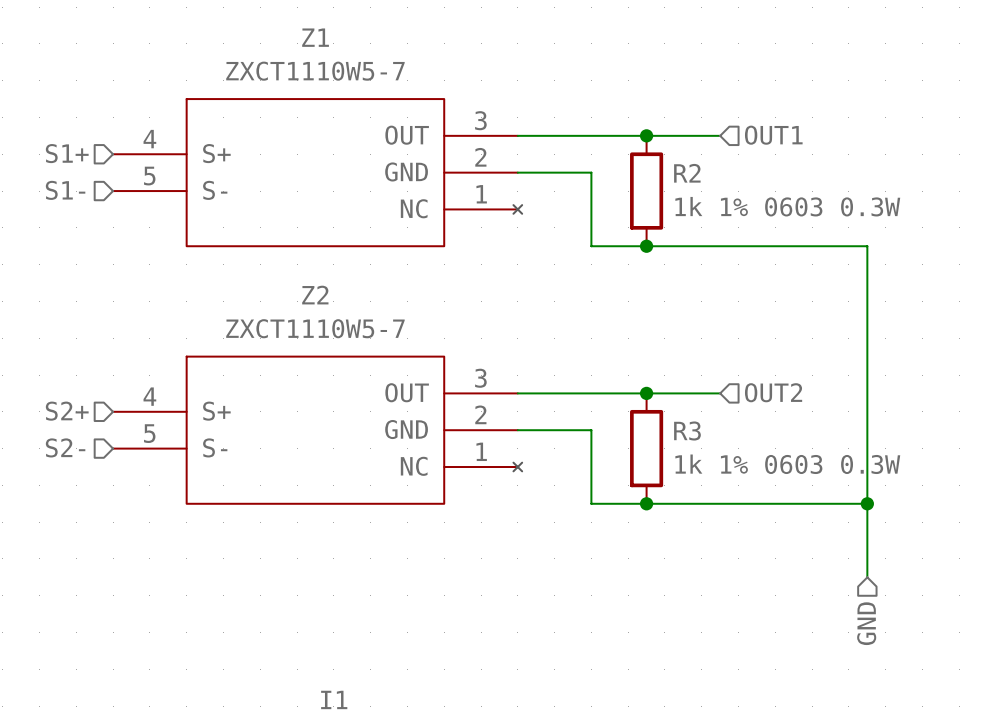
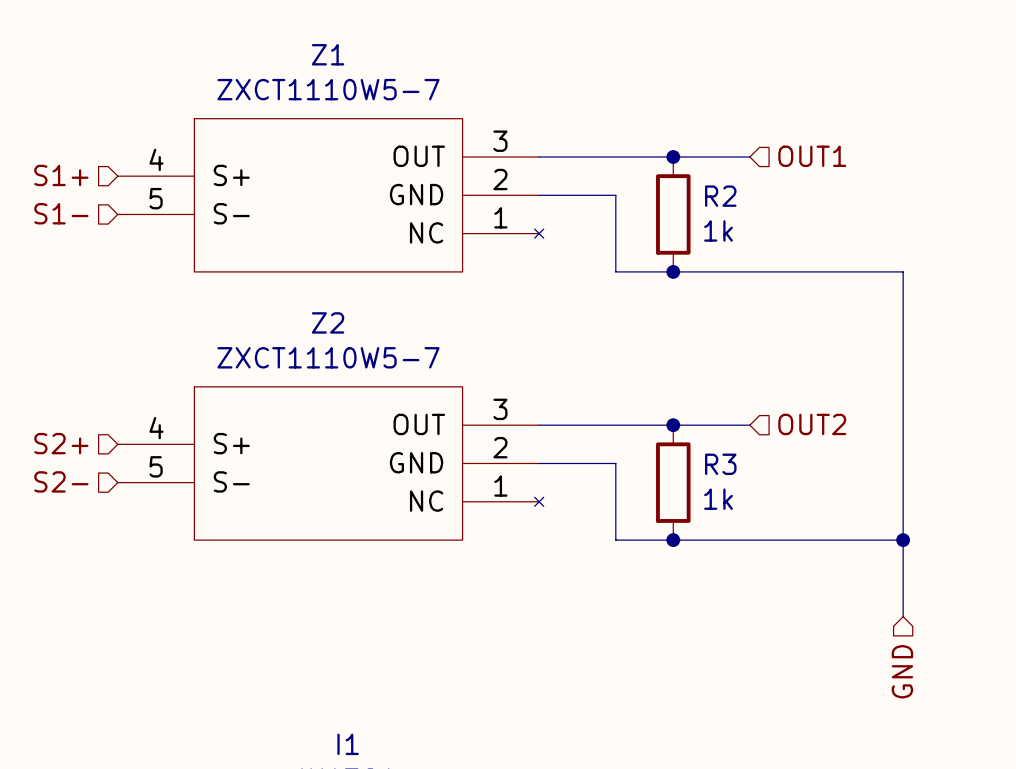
R2 value: 1k 1% 0603 0.3W (787, 206) -> 1k (718, 230)
R3 value: 1k 1% 0603 0.3W (787, 464) -> 1k (718, 499)

